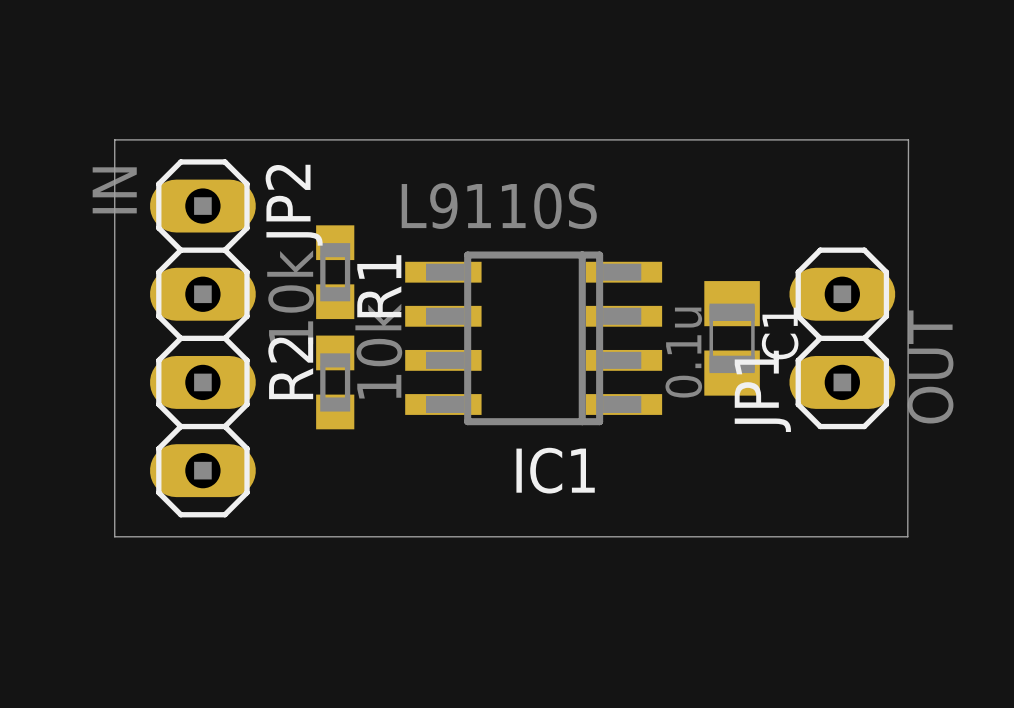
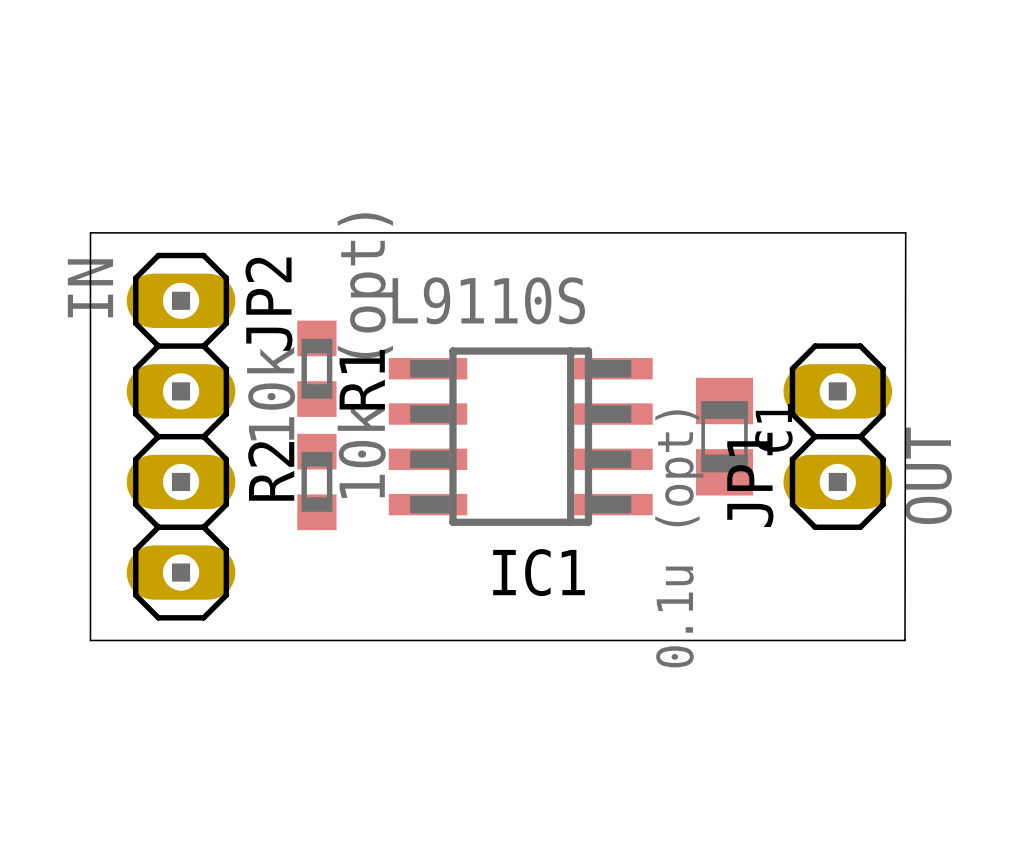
R2 value: 10k (378, 351) -> 10k (opt) (367, 355)
C1 value: 0.1u (683, 352) -> 0.1u (opt) (679, 538)

